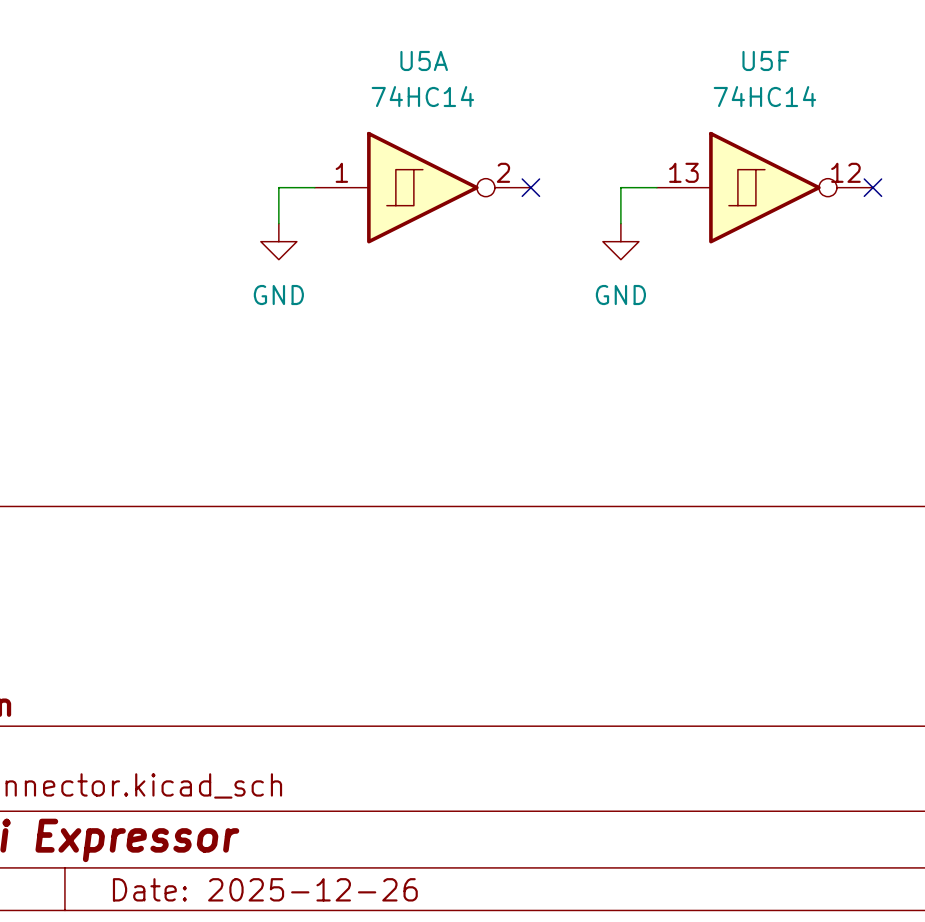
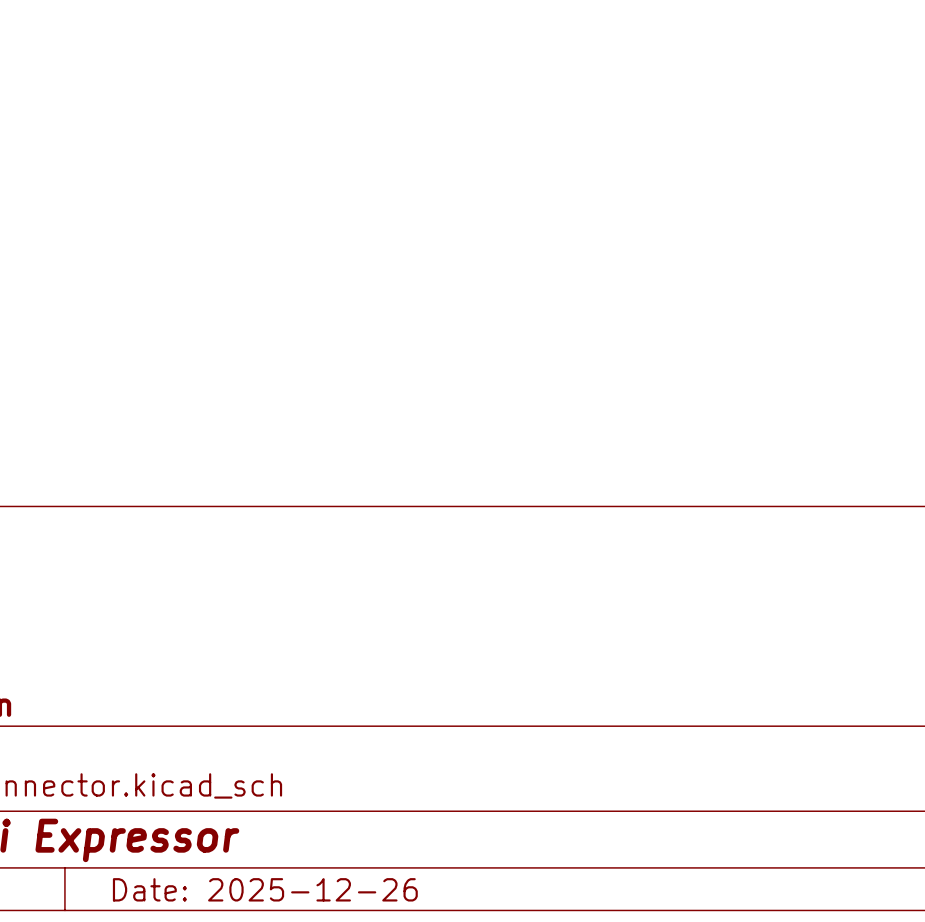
wire: (314, 187) (278, 187) (278, 223) -> none
U5A: 74HC14 (422, 187) -> none
no-connect mark: (530, 187) -> none
wire: (656, 187) (620, 187) (620, 223) -> none
U5F: 74HC14 (764, 187) -> none
no-connect mark: (872, 187) -> none
power symbol: GND (278, 241) -> none
power symbol: GND (620, 241) -> none

